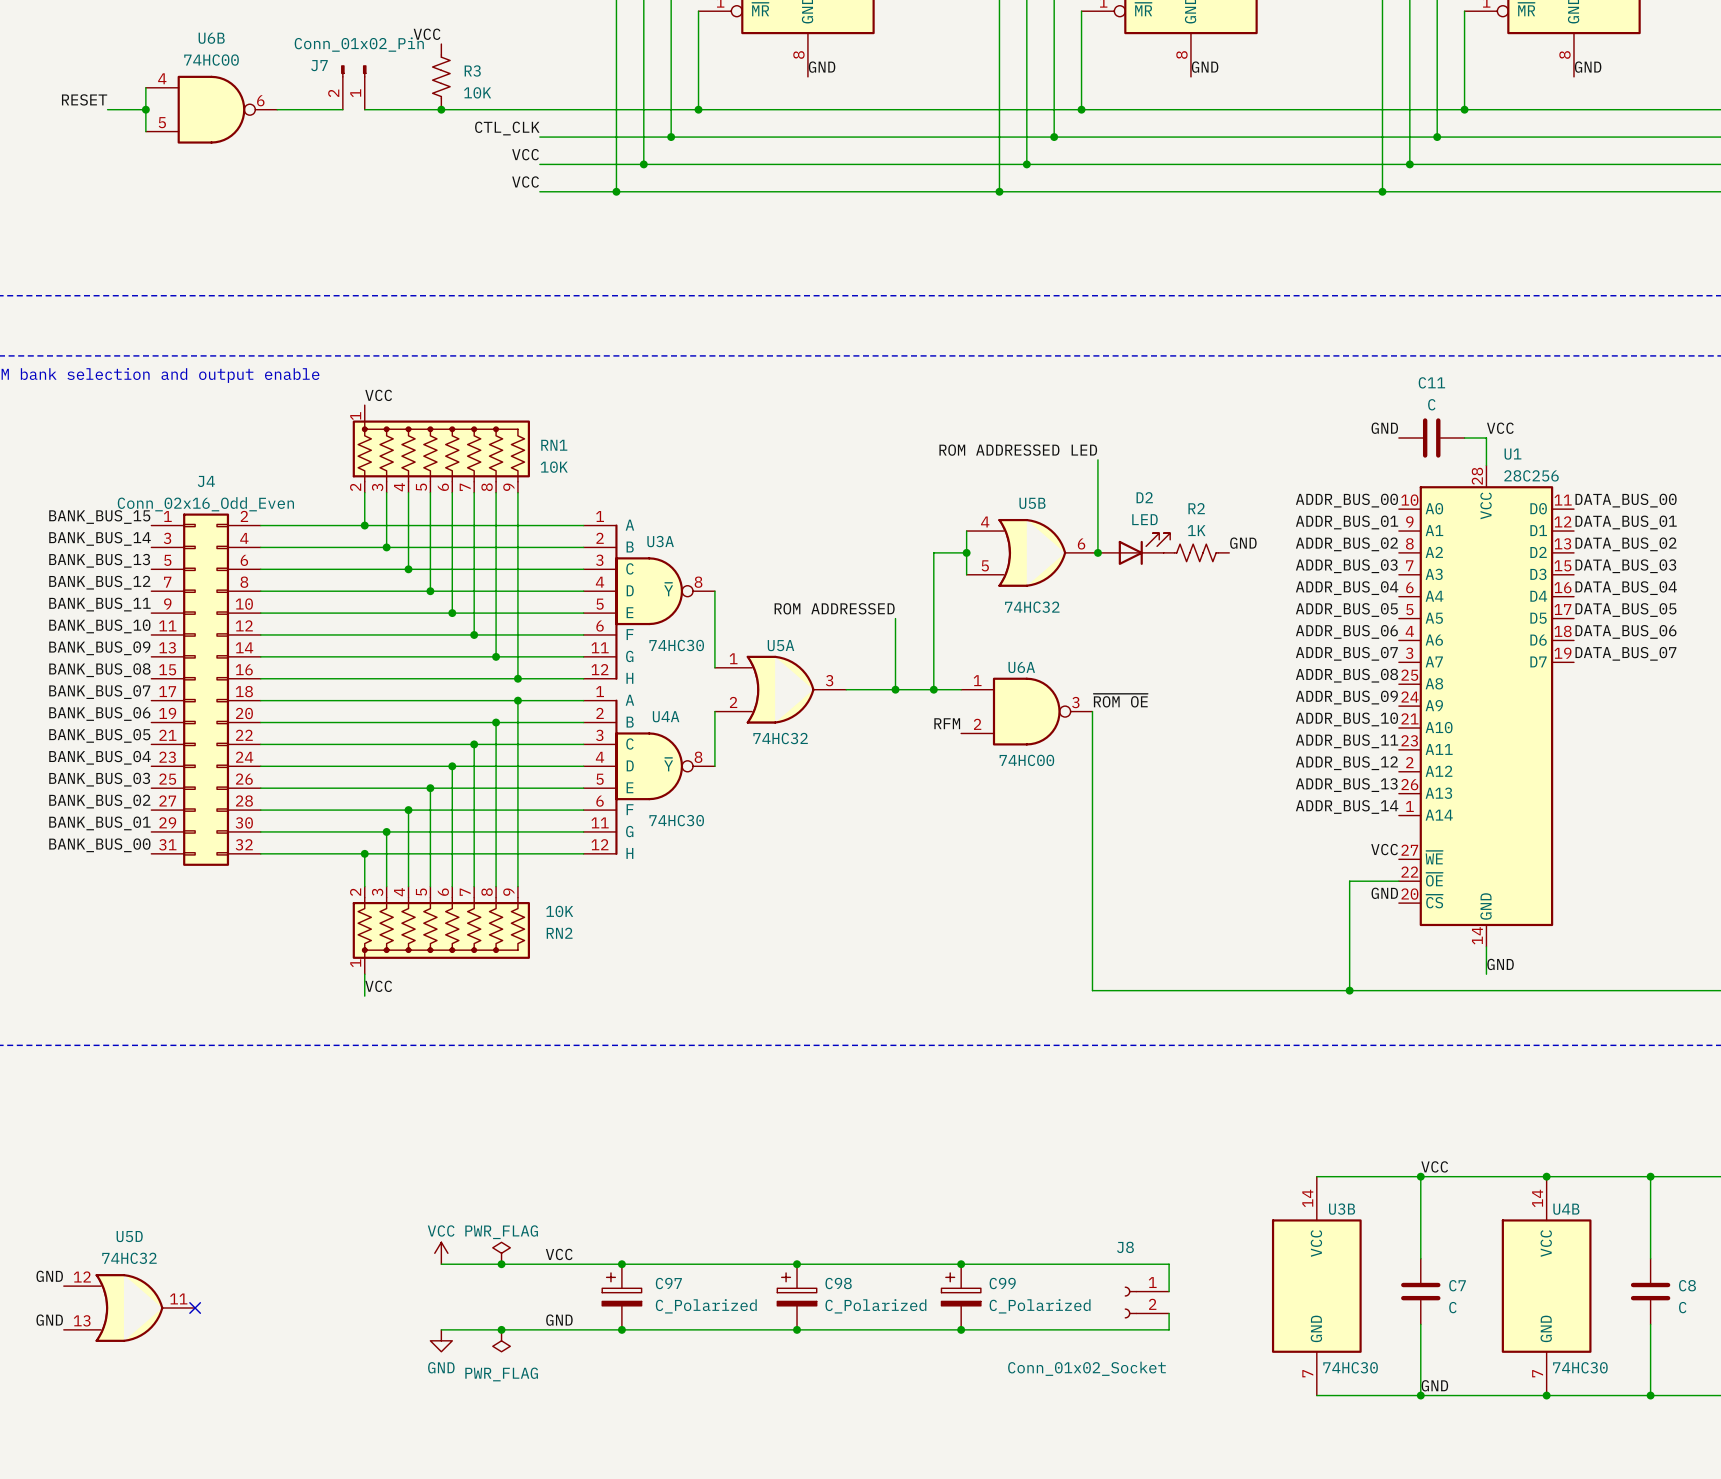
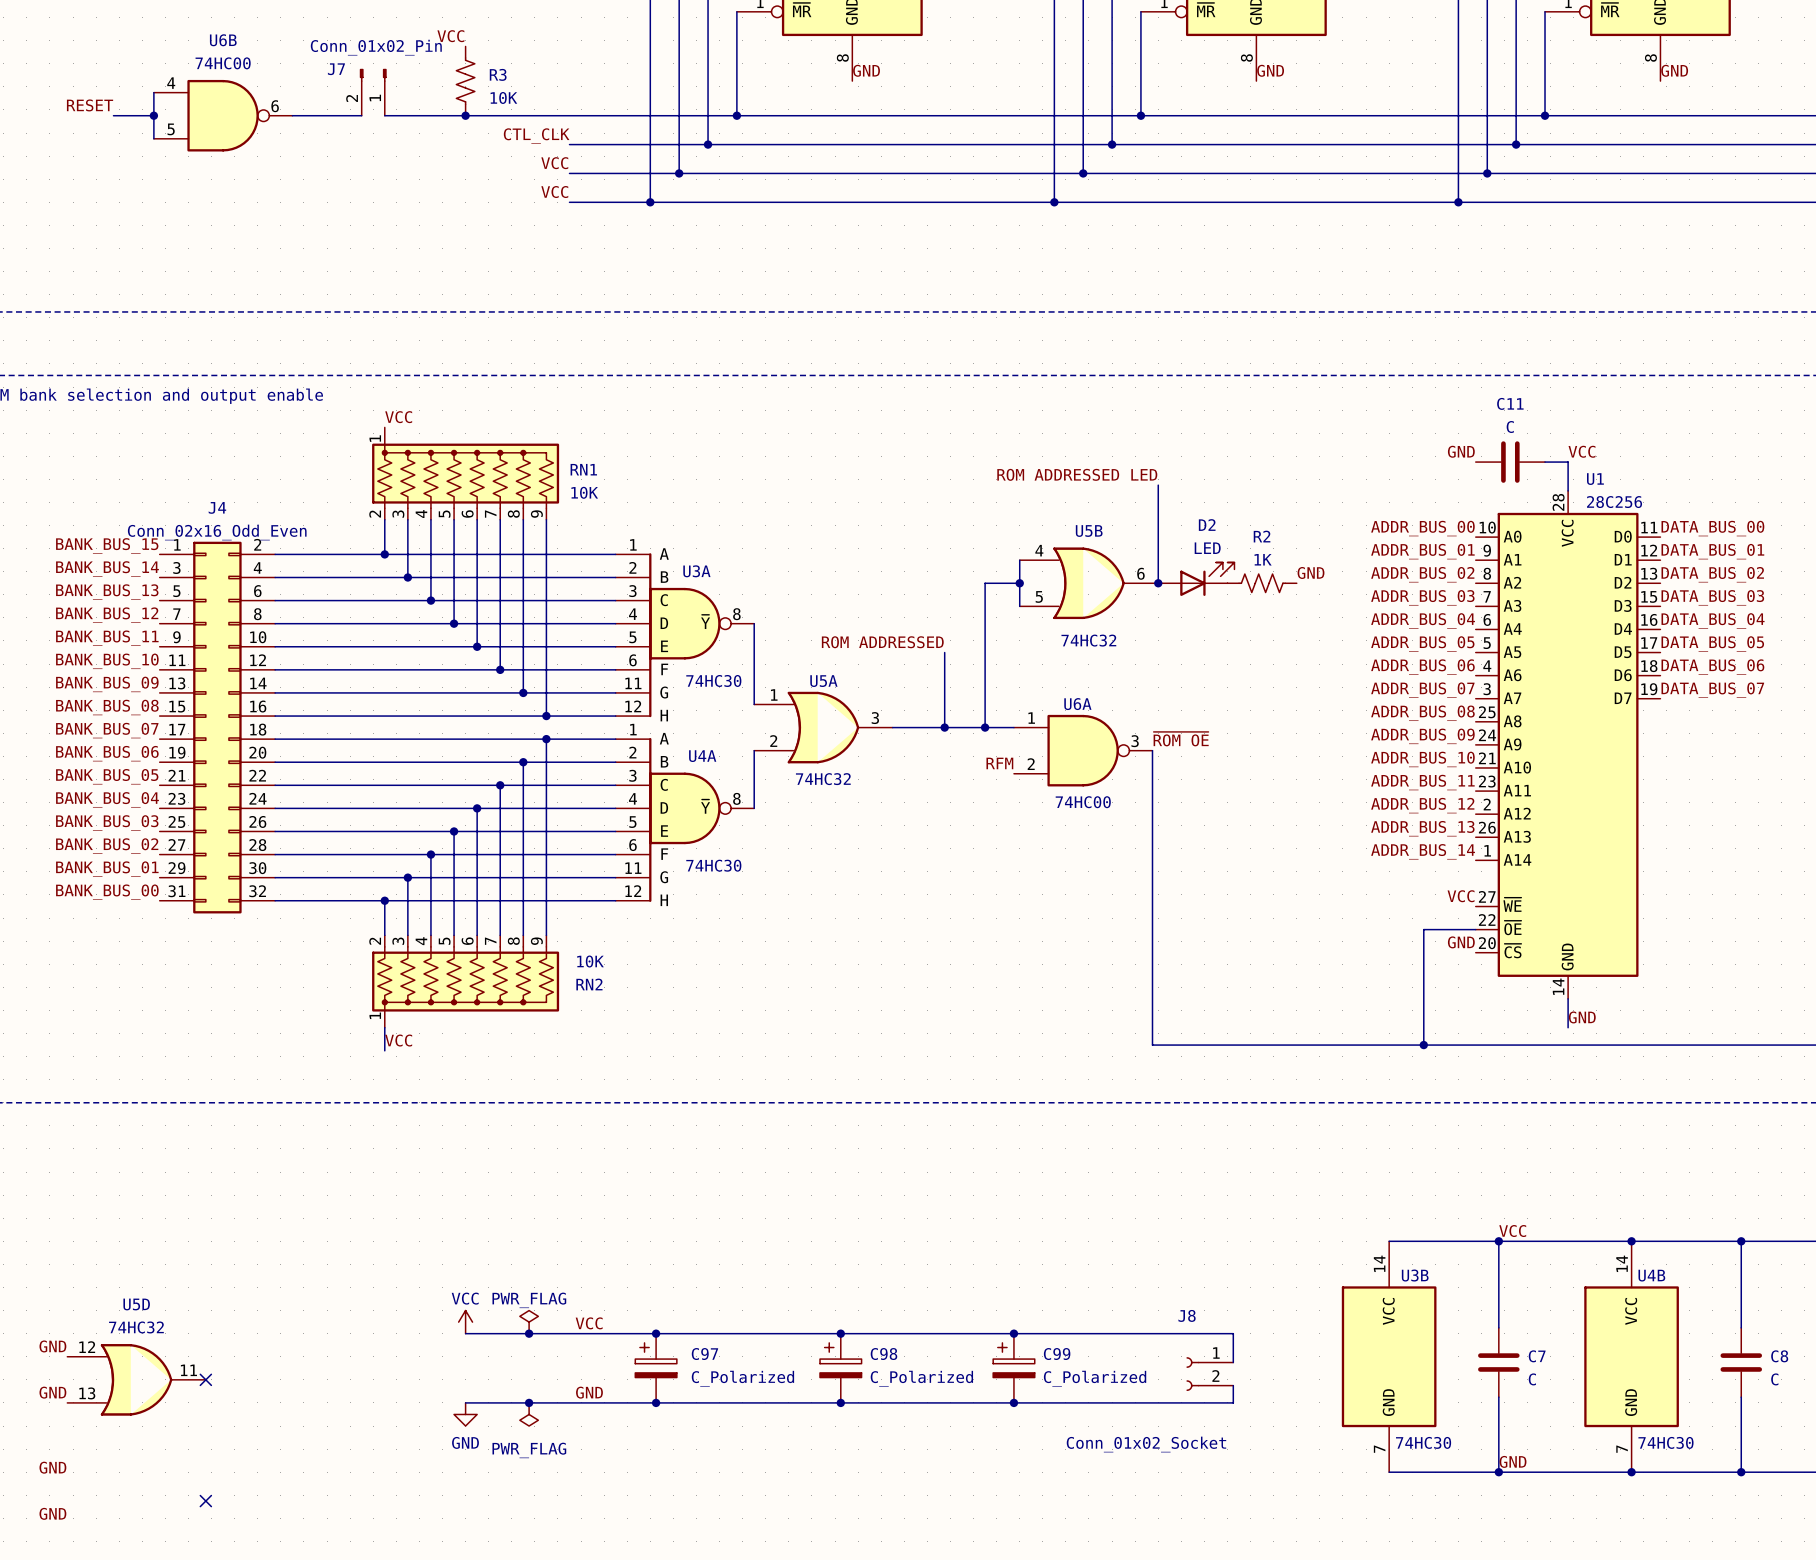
label: none -> GND (52, 1467)
no-connect mark: none -> (205, 1501)
label: none -> GND (52, 1513)

